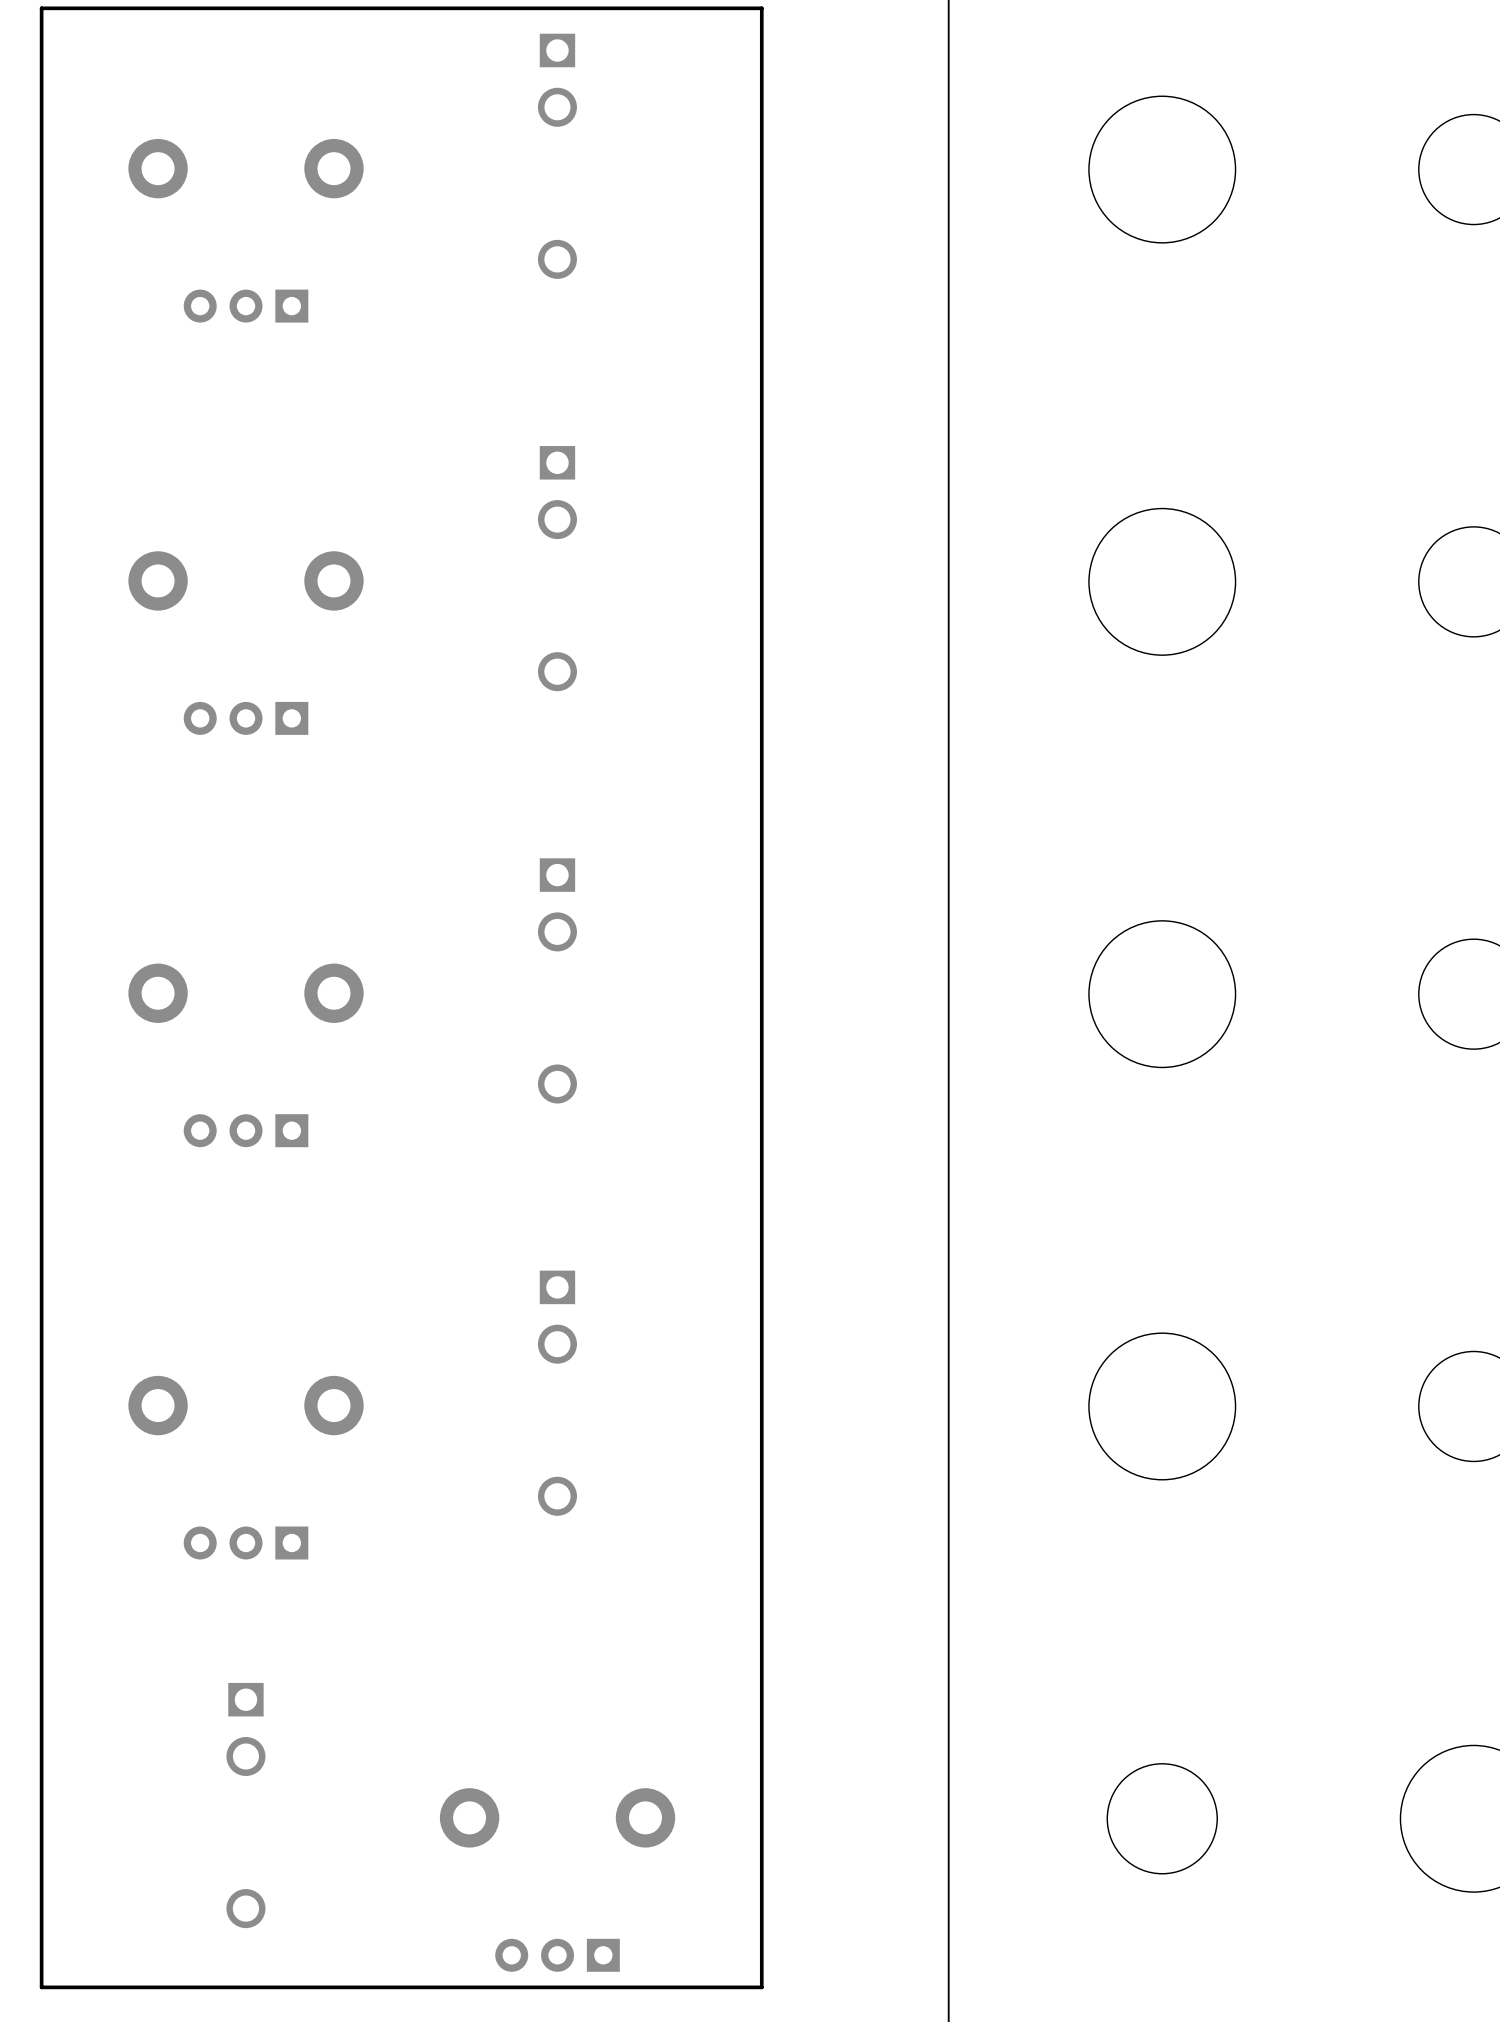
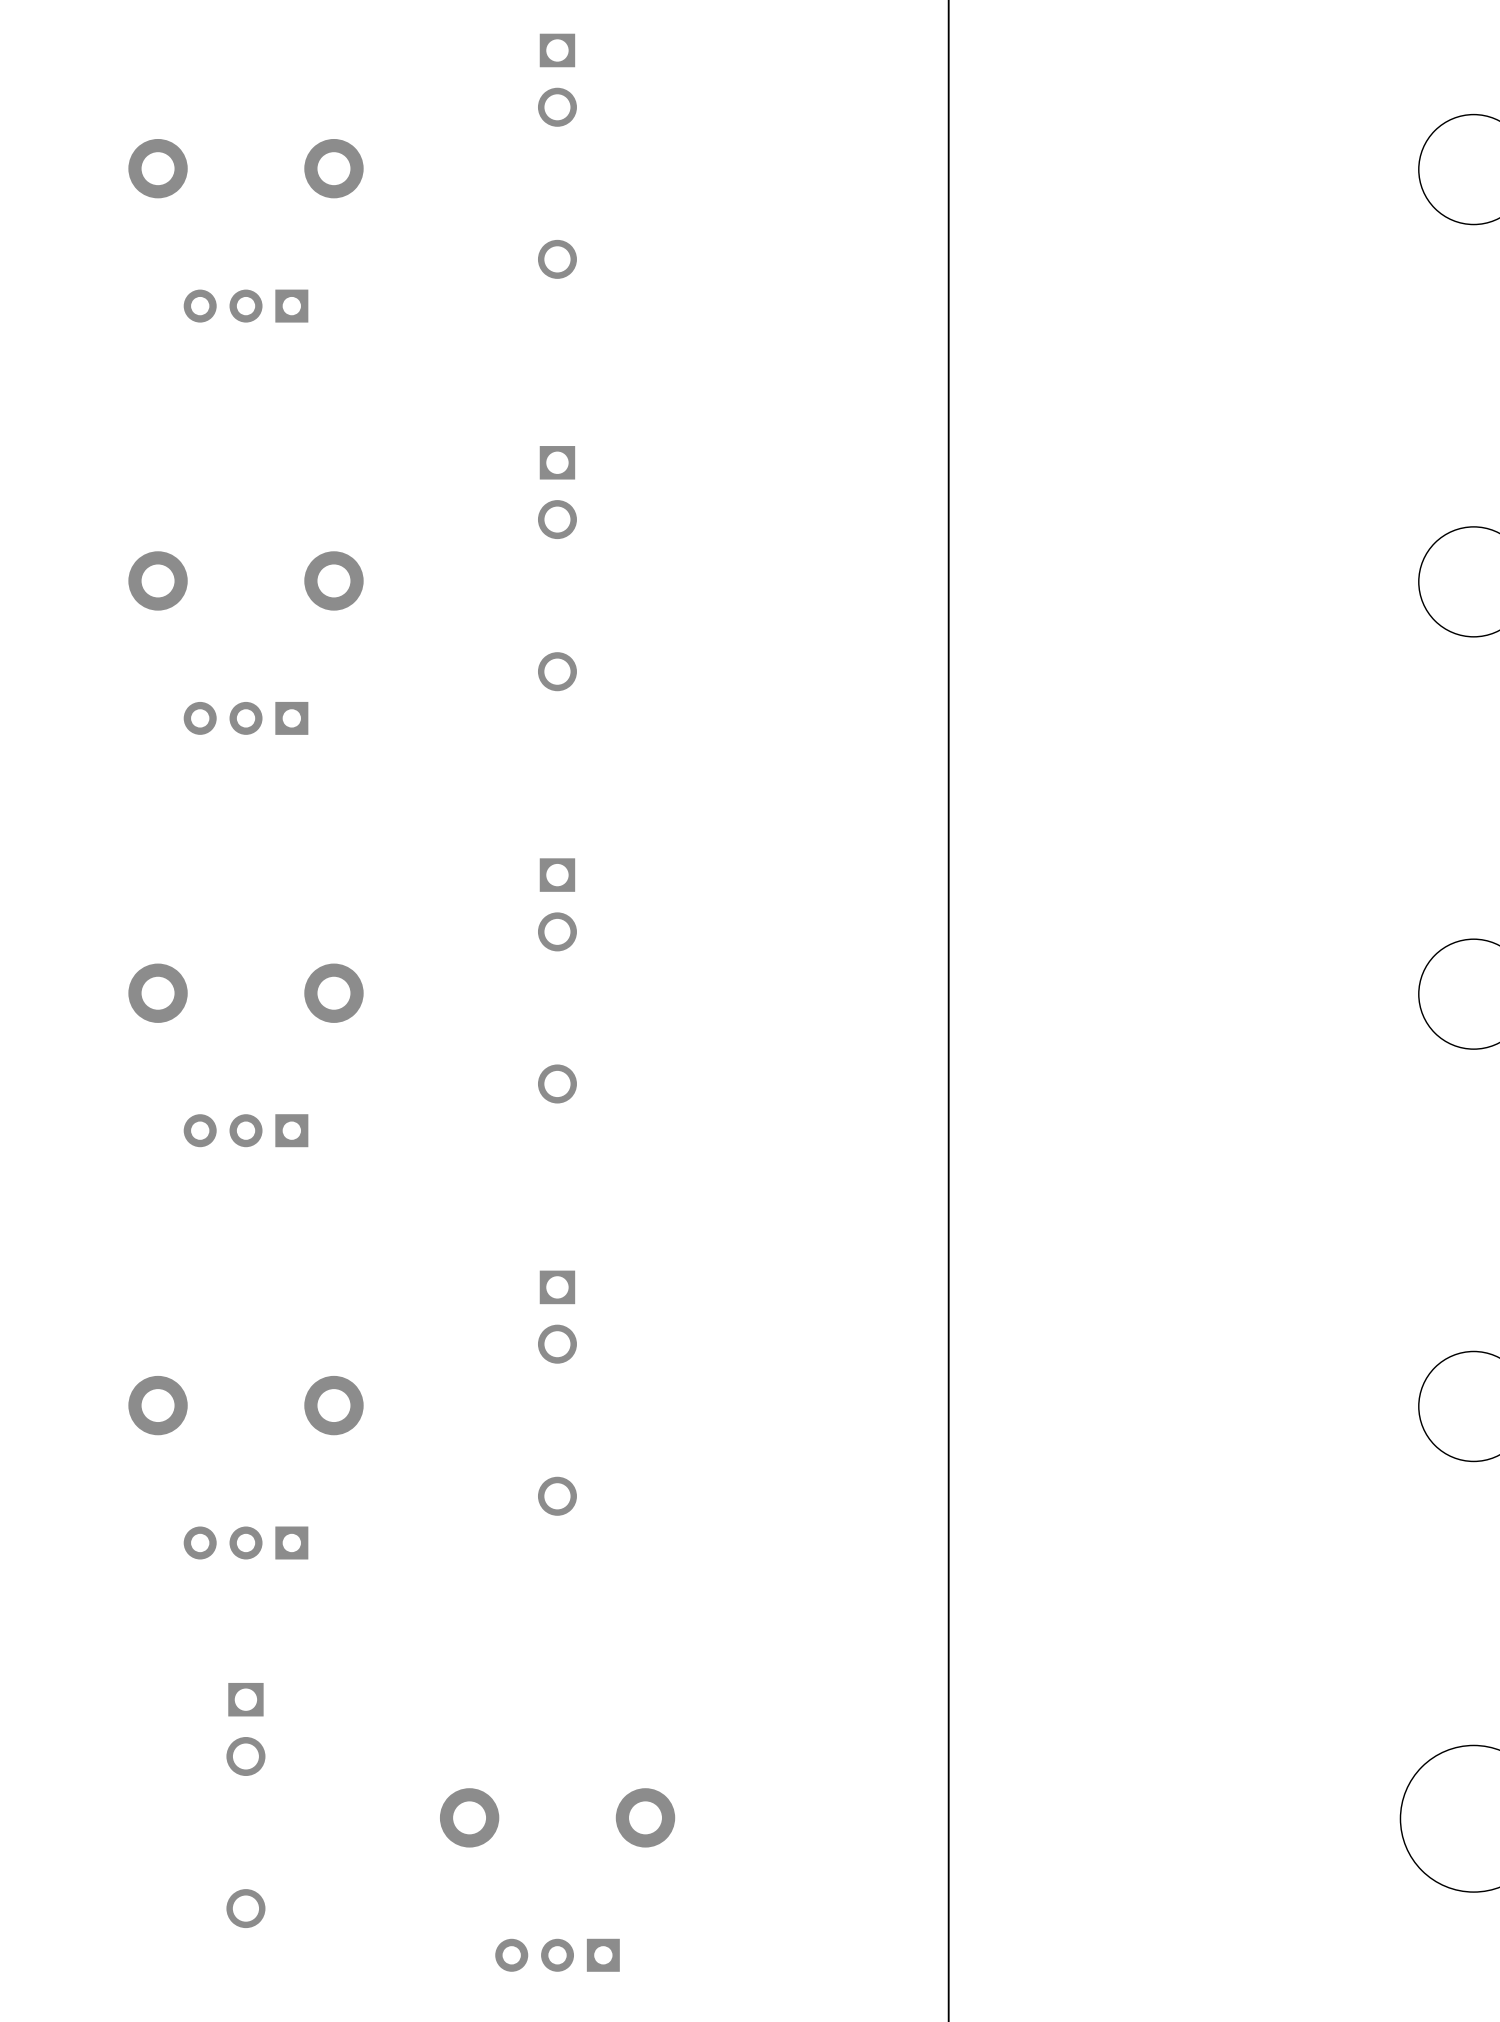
board edge: (761, 8) (41, 8) (41, 1987) (761, 1987) (761, 8) -> none
round board edge: [1088, 95, 1237, 244] -> none
round board edge: [1088, 508, 1237, 656] -> none
round board edge: [1088, 920, 1237, 1068] -> none
round board edge: [1088, 1332, 1237, 1481] -> none
round board edge: [1106, 1763, 1218, 1875] -> none

